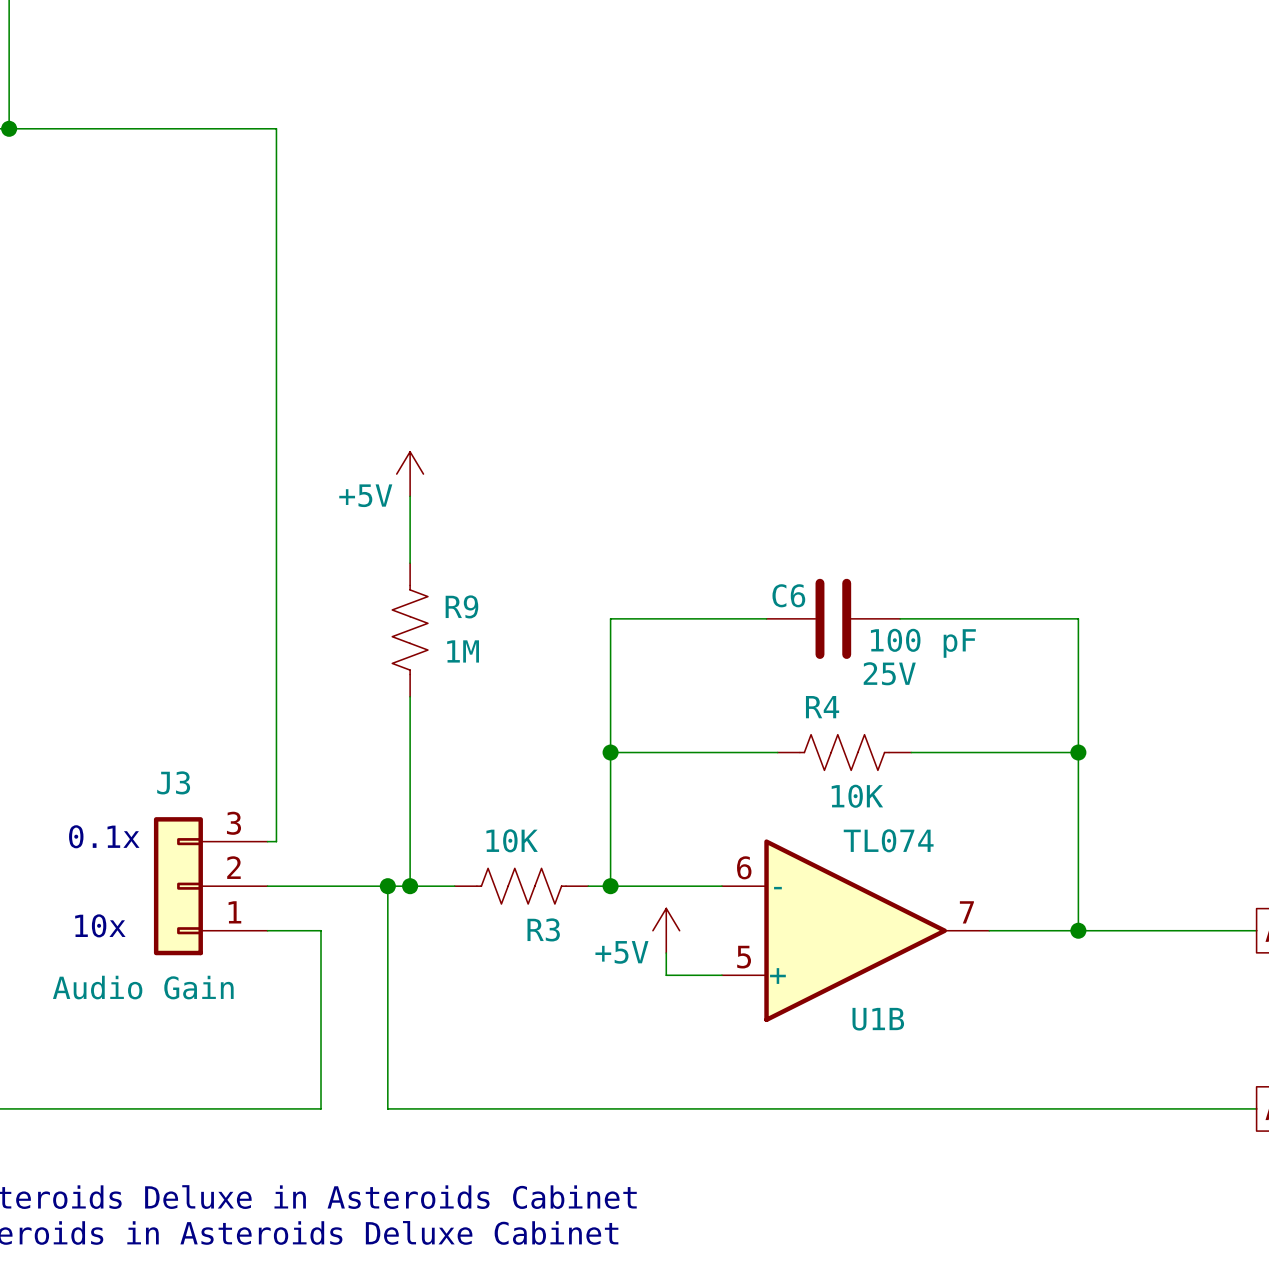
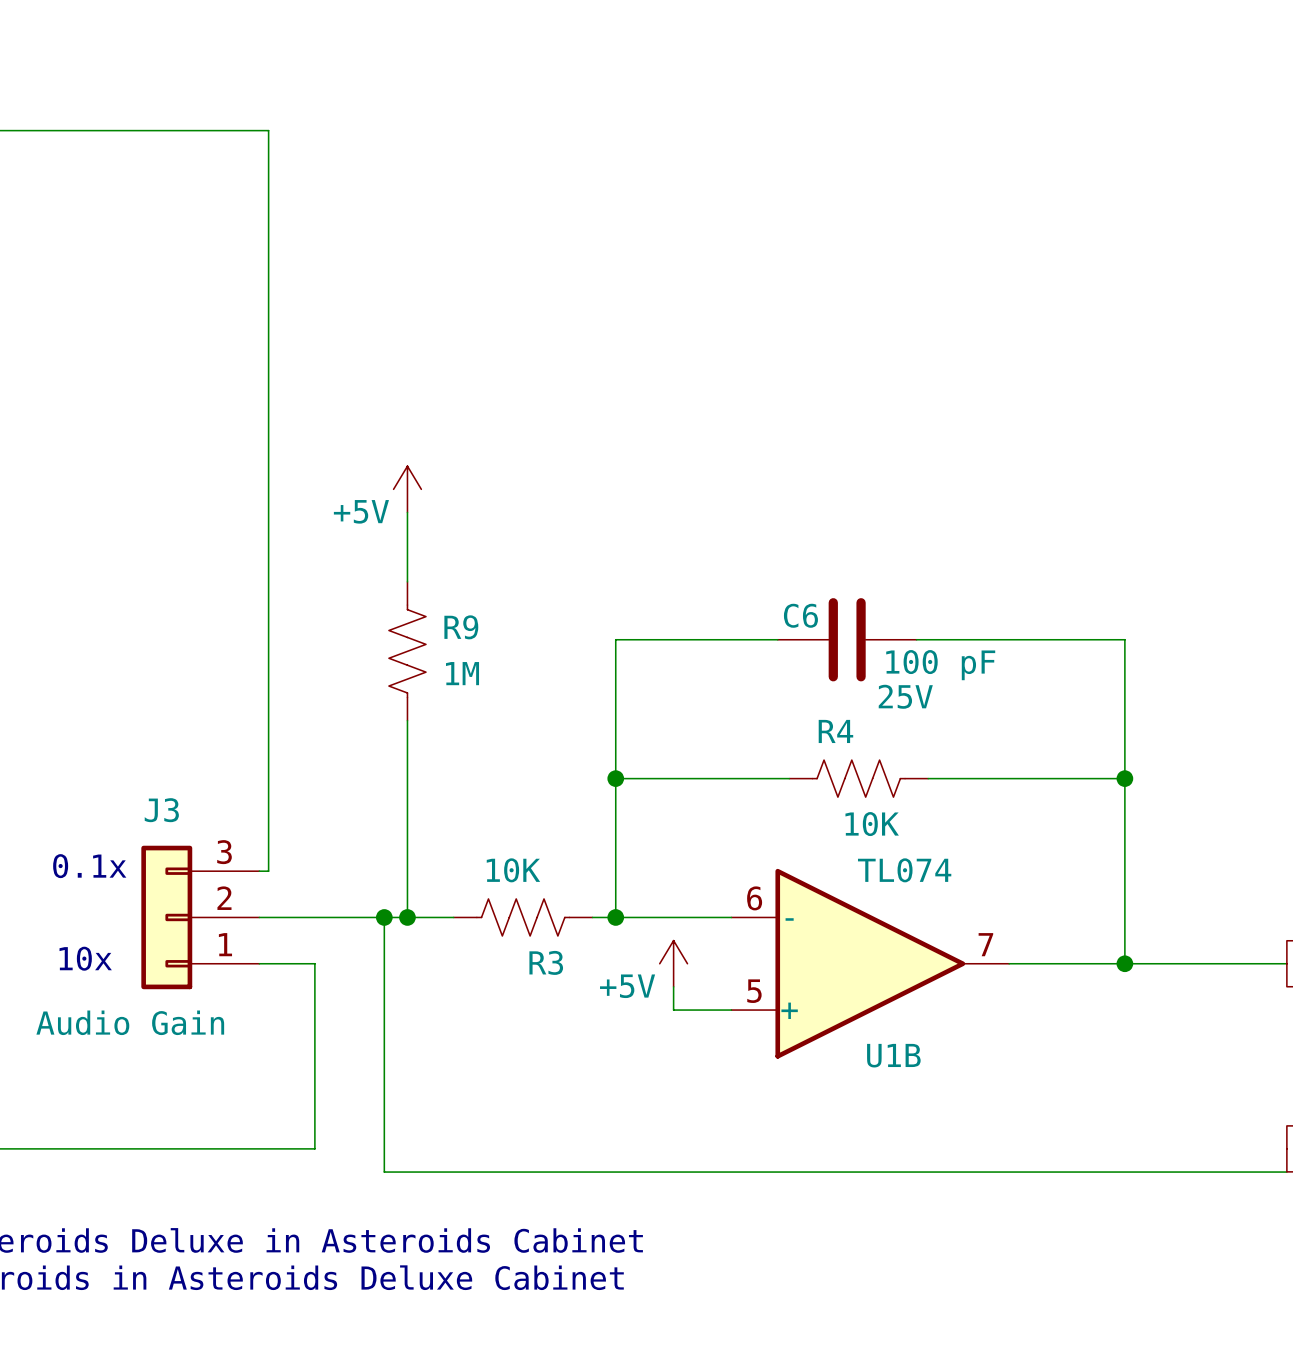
wire: (1078, 618) (1078, 930) -> (1101, 639) (1124, 639) (1124, 963)
wire: none -> (1101, 778) (1124, 778)
junction position: (1078, 752) -> (1124, 778)
junction position: (1078, 930) -> (1124, 963)
wire: (387, 1108) (1256, 1108) -> (384, 1148) (384, 1172) (1286, 1172)

